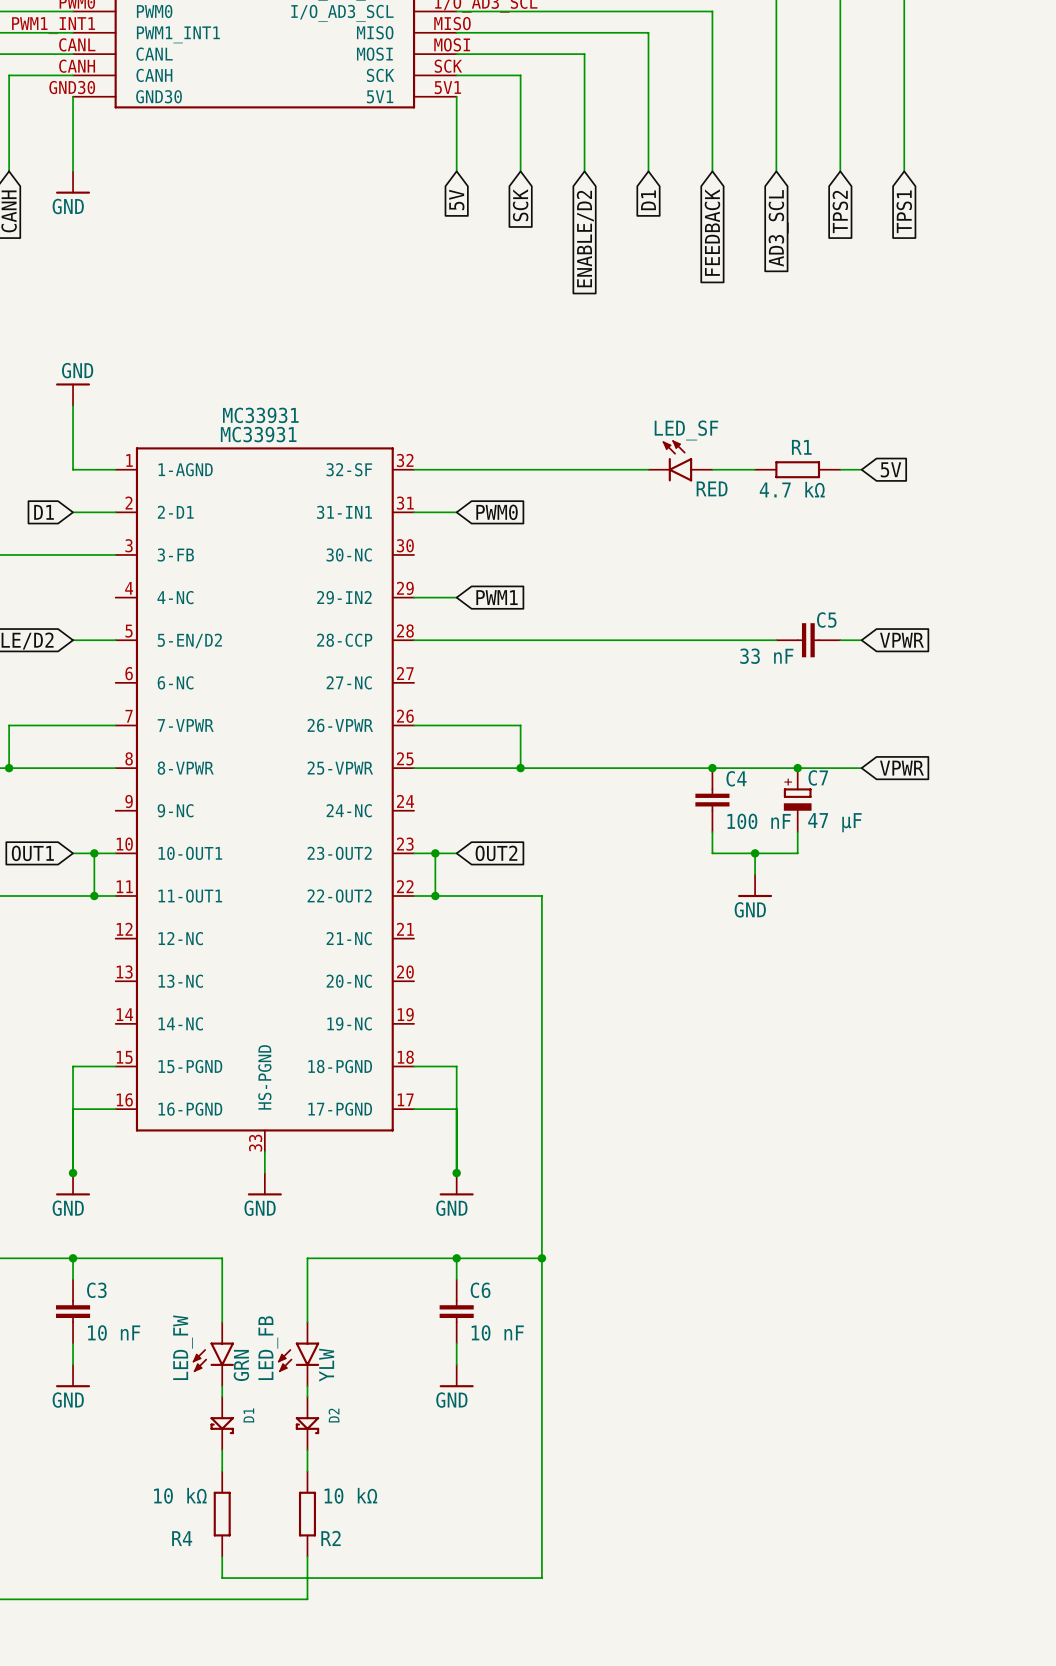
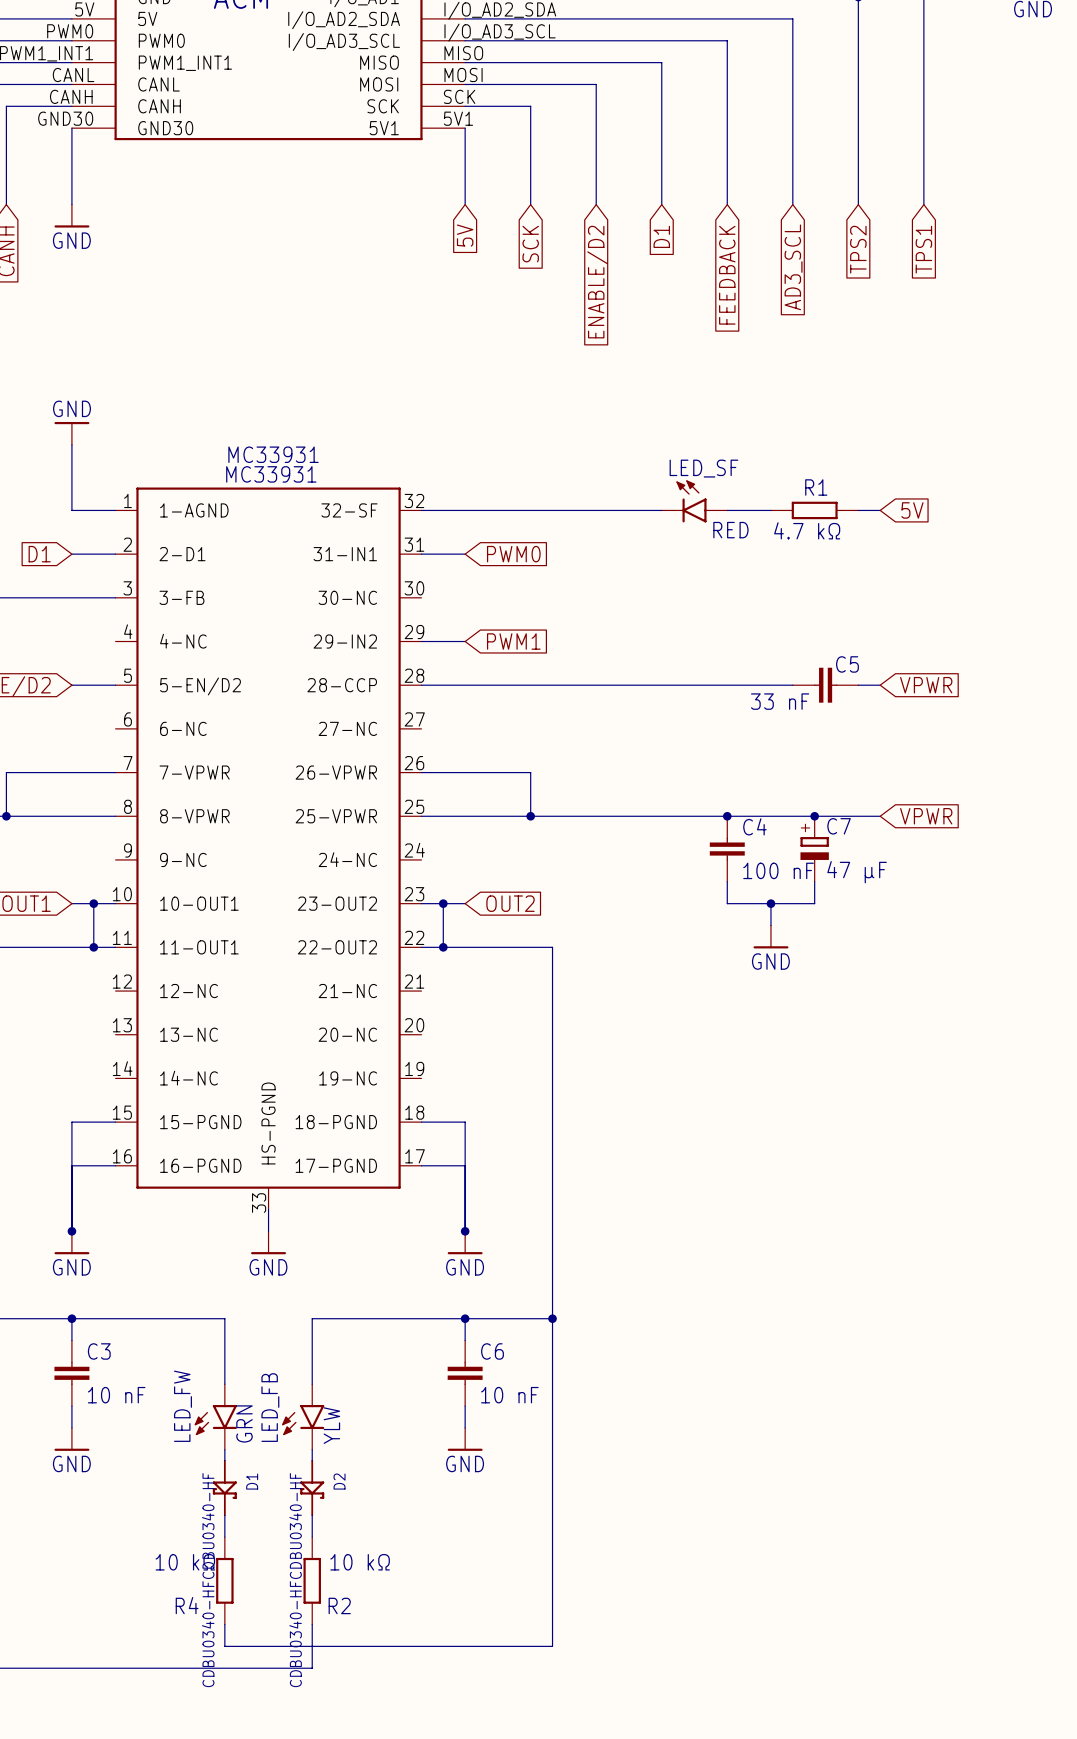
D1 value: none -> CDBU0340-HFCDBU0340-HF (208, 1580)
D2 value: none -> CDBU0340-HFCDBU0340-HF (295, 1580)

